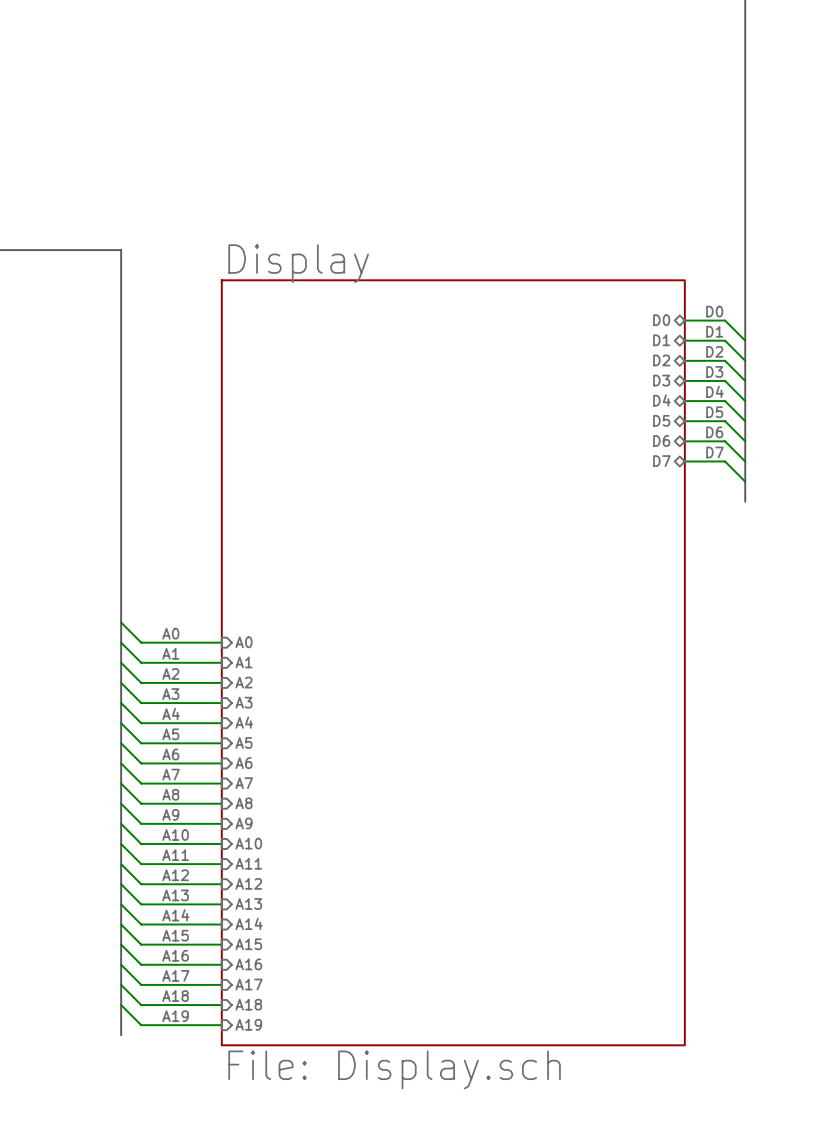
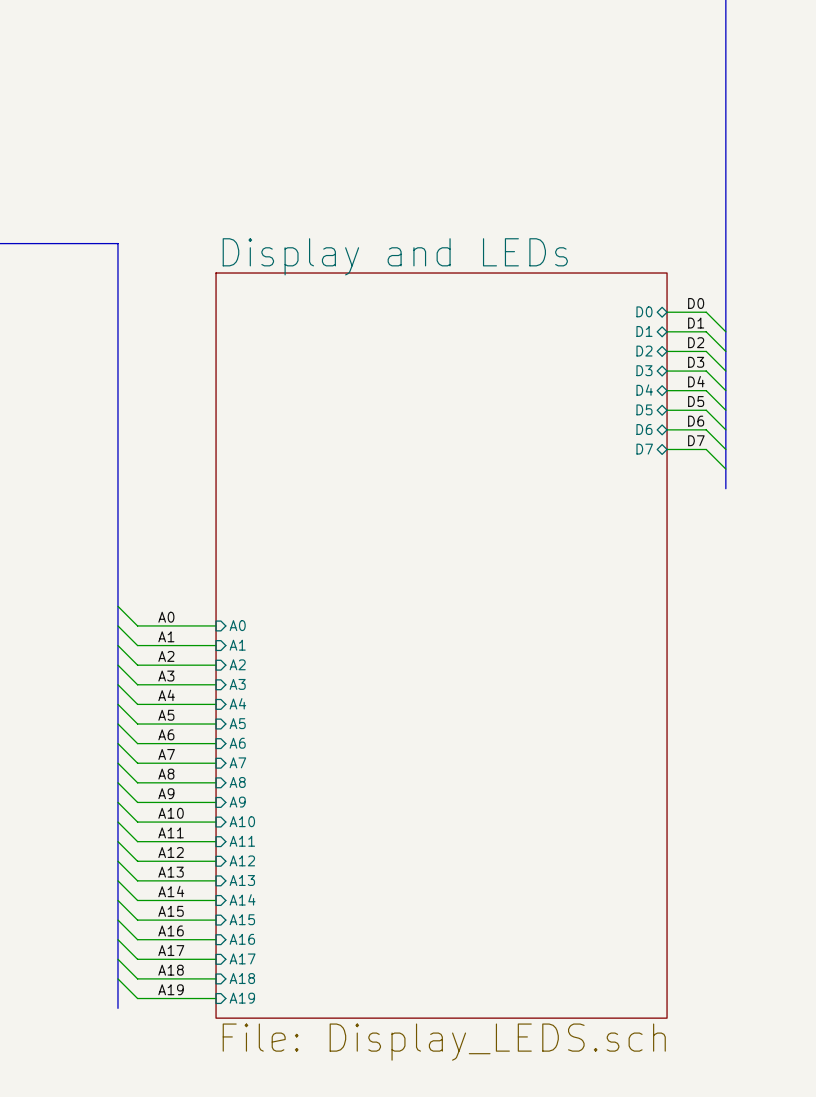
sheet Display name: Display (298, 263) -> Display and LEDs (395, 256)
sheet Display value: File: Display.sch (394, 1069) -> File: Display_LEDS.sch (444, 1042)

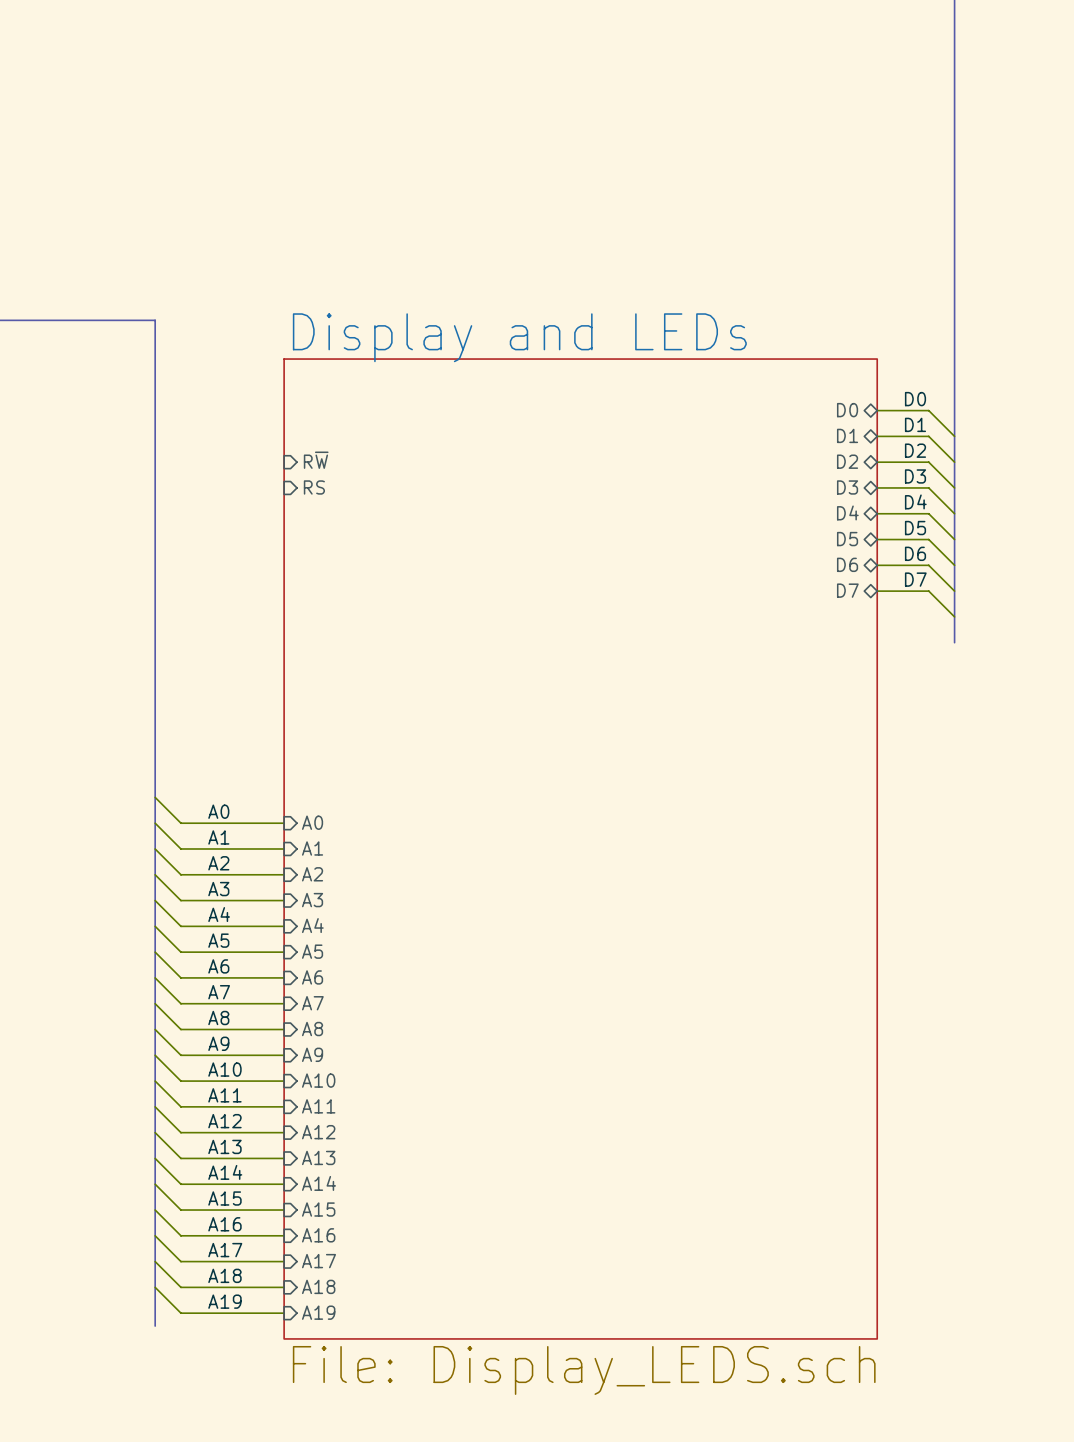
sheet pin: none -> R~{W} (316, 460)
sheet pin: none -> RS (314, 487)

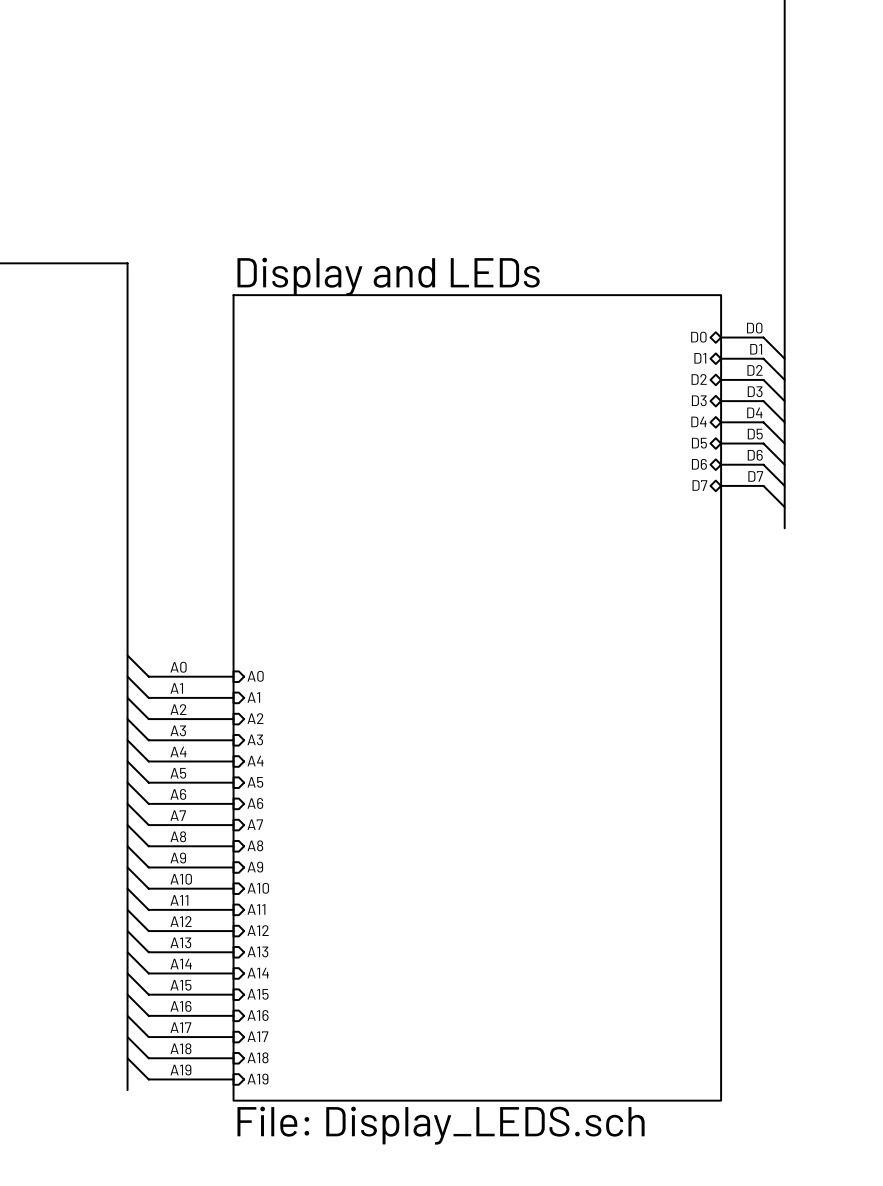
sheet pin: R~{W} (316, 460) -> none
sheet pin: RS (314, 487) -> none

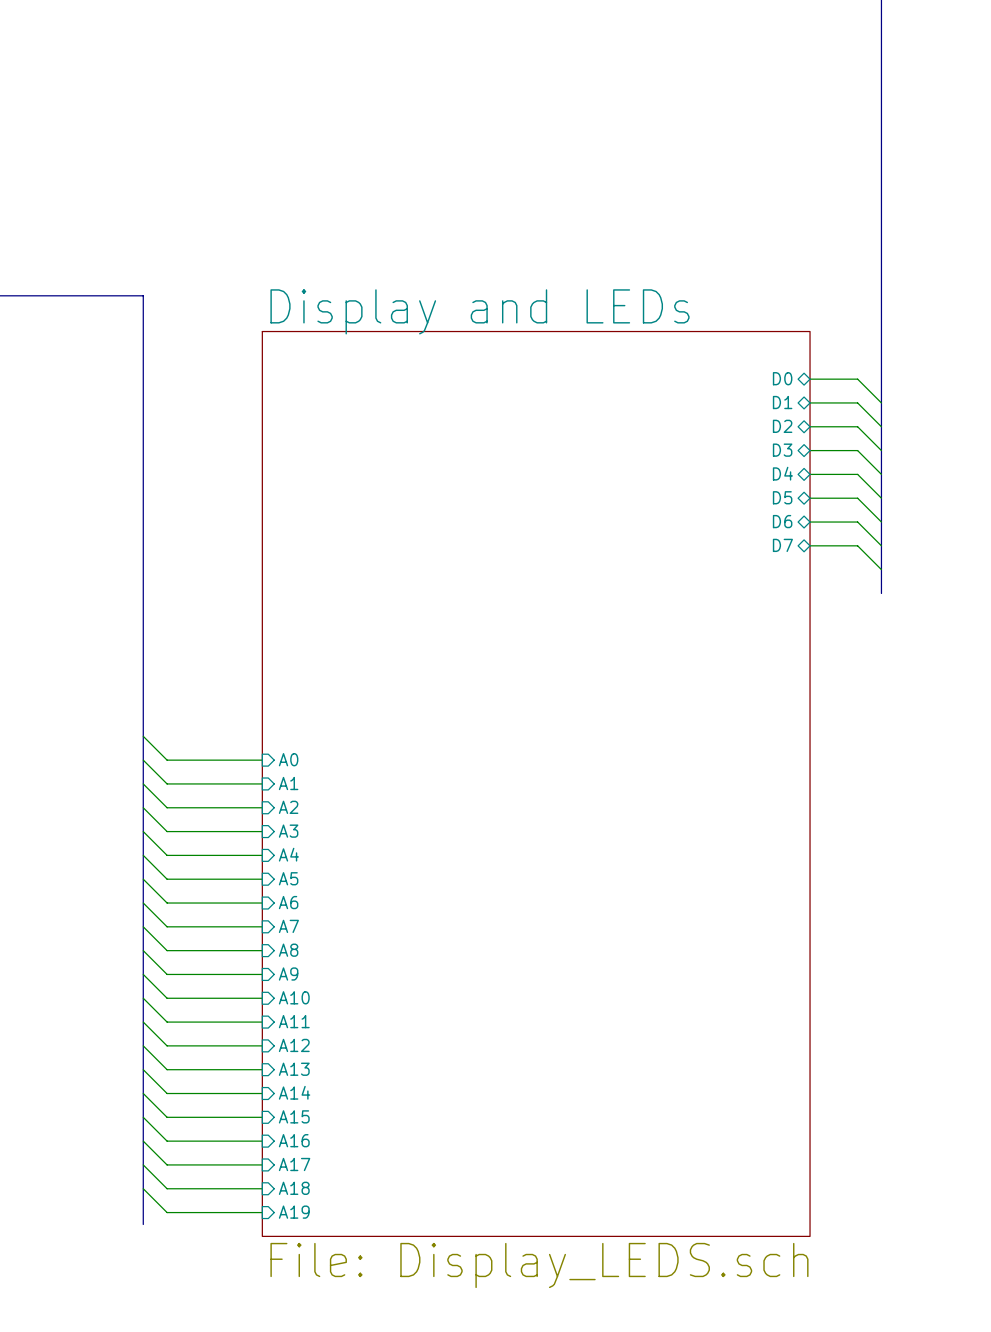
label: D0 (754, 328) -> none
label: D1 (756, 349) -> none
label: D2 (755, 370) -> none
label: D3 (755, 391) -> none
label: D4 (754, 412) -> none
label: D5 (755, 434) -> none
label: D6 (755, 455) -> none
label: D7 (755, 476) -> none
label: A0 (178, 667) -> none
label: A1 (176, 688) -> none
label: A2 (178, 709) -> none
label: A3 (178, 730) -> none
label: A4 (178, 752) -> none
label: A5 (178, 773) -> none
label: A6 (178, 794) -> none
label: A7 (178, 815) -> none
label: A8 (178, 836) -> none
label: A9 (178, 858) -> none
label: A10 (181, 879) -> none
label: A11 (179, 900) -> none
label: A12 (181, 921) -> none
label: A13 (180, 942) -> none
label: A14 (181, 964) -> none
label: A15 (180, 985) -> none
label: A16 (180, 1006) -> none
label: A17 (180, 1027) -> none
label: A18 (180, 1048) -> none
label: A19 (180, 1070) -> none

